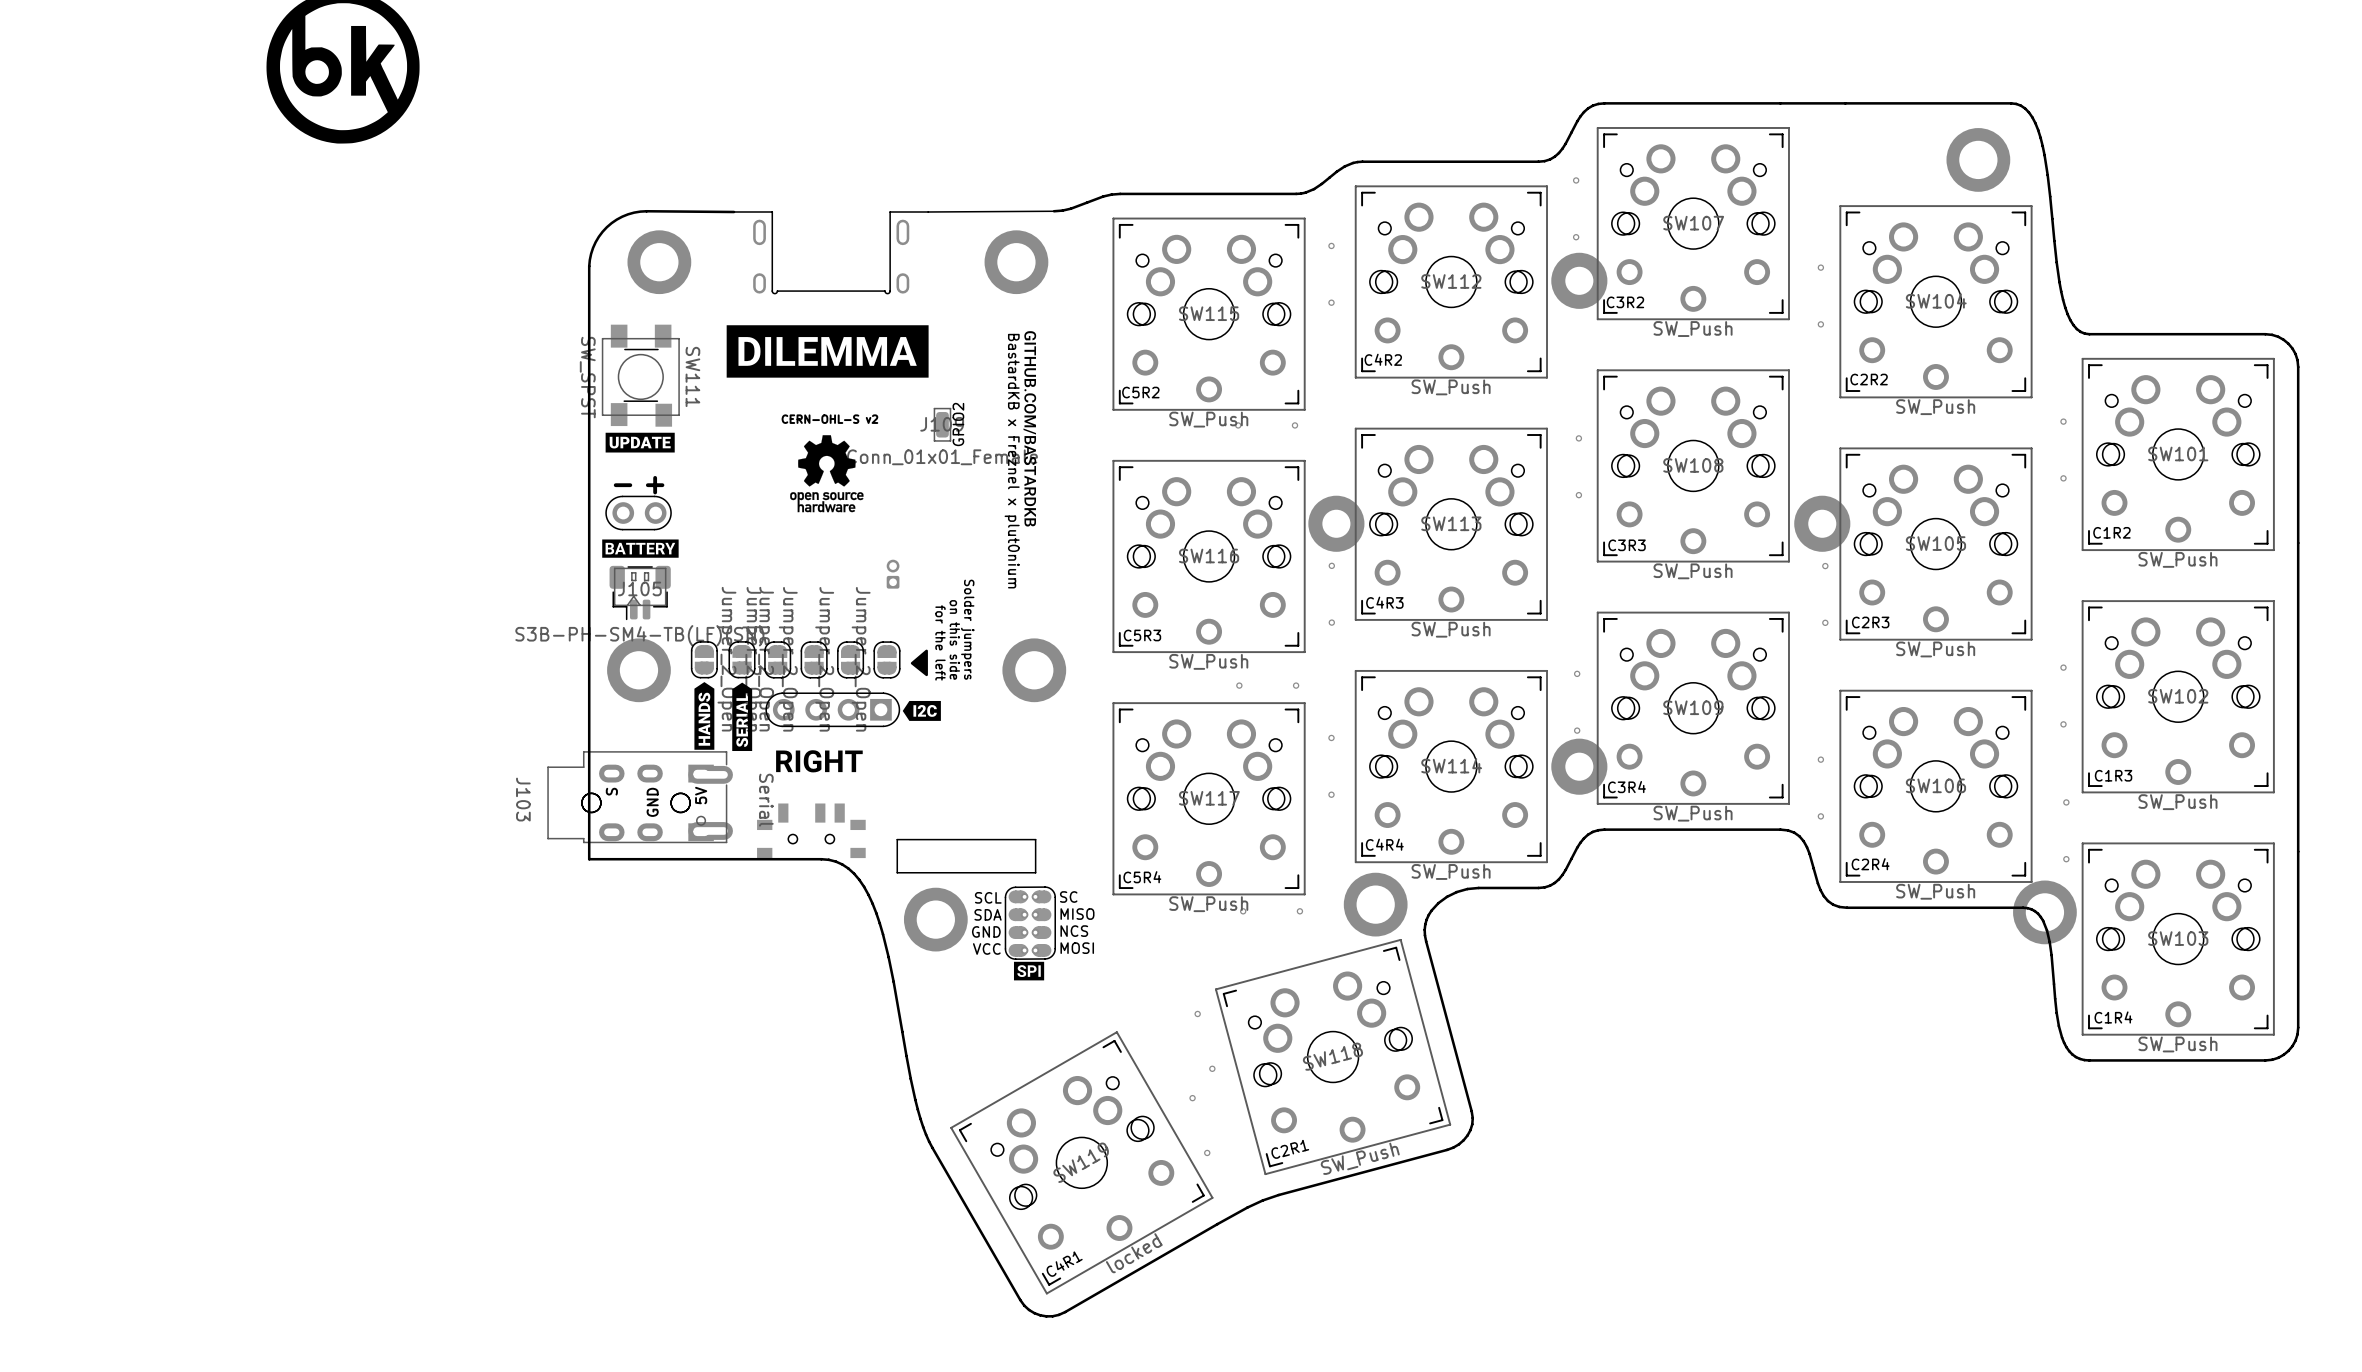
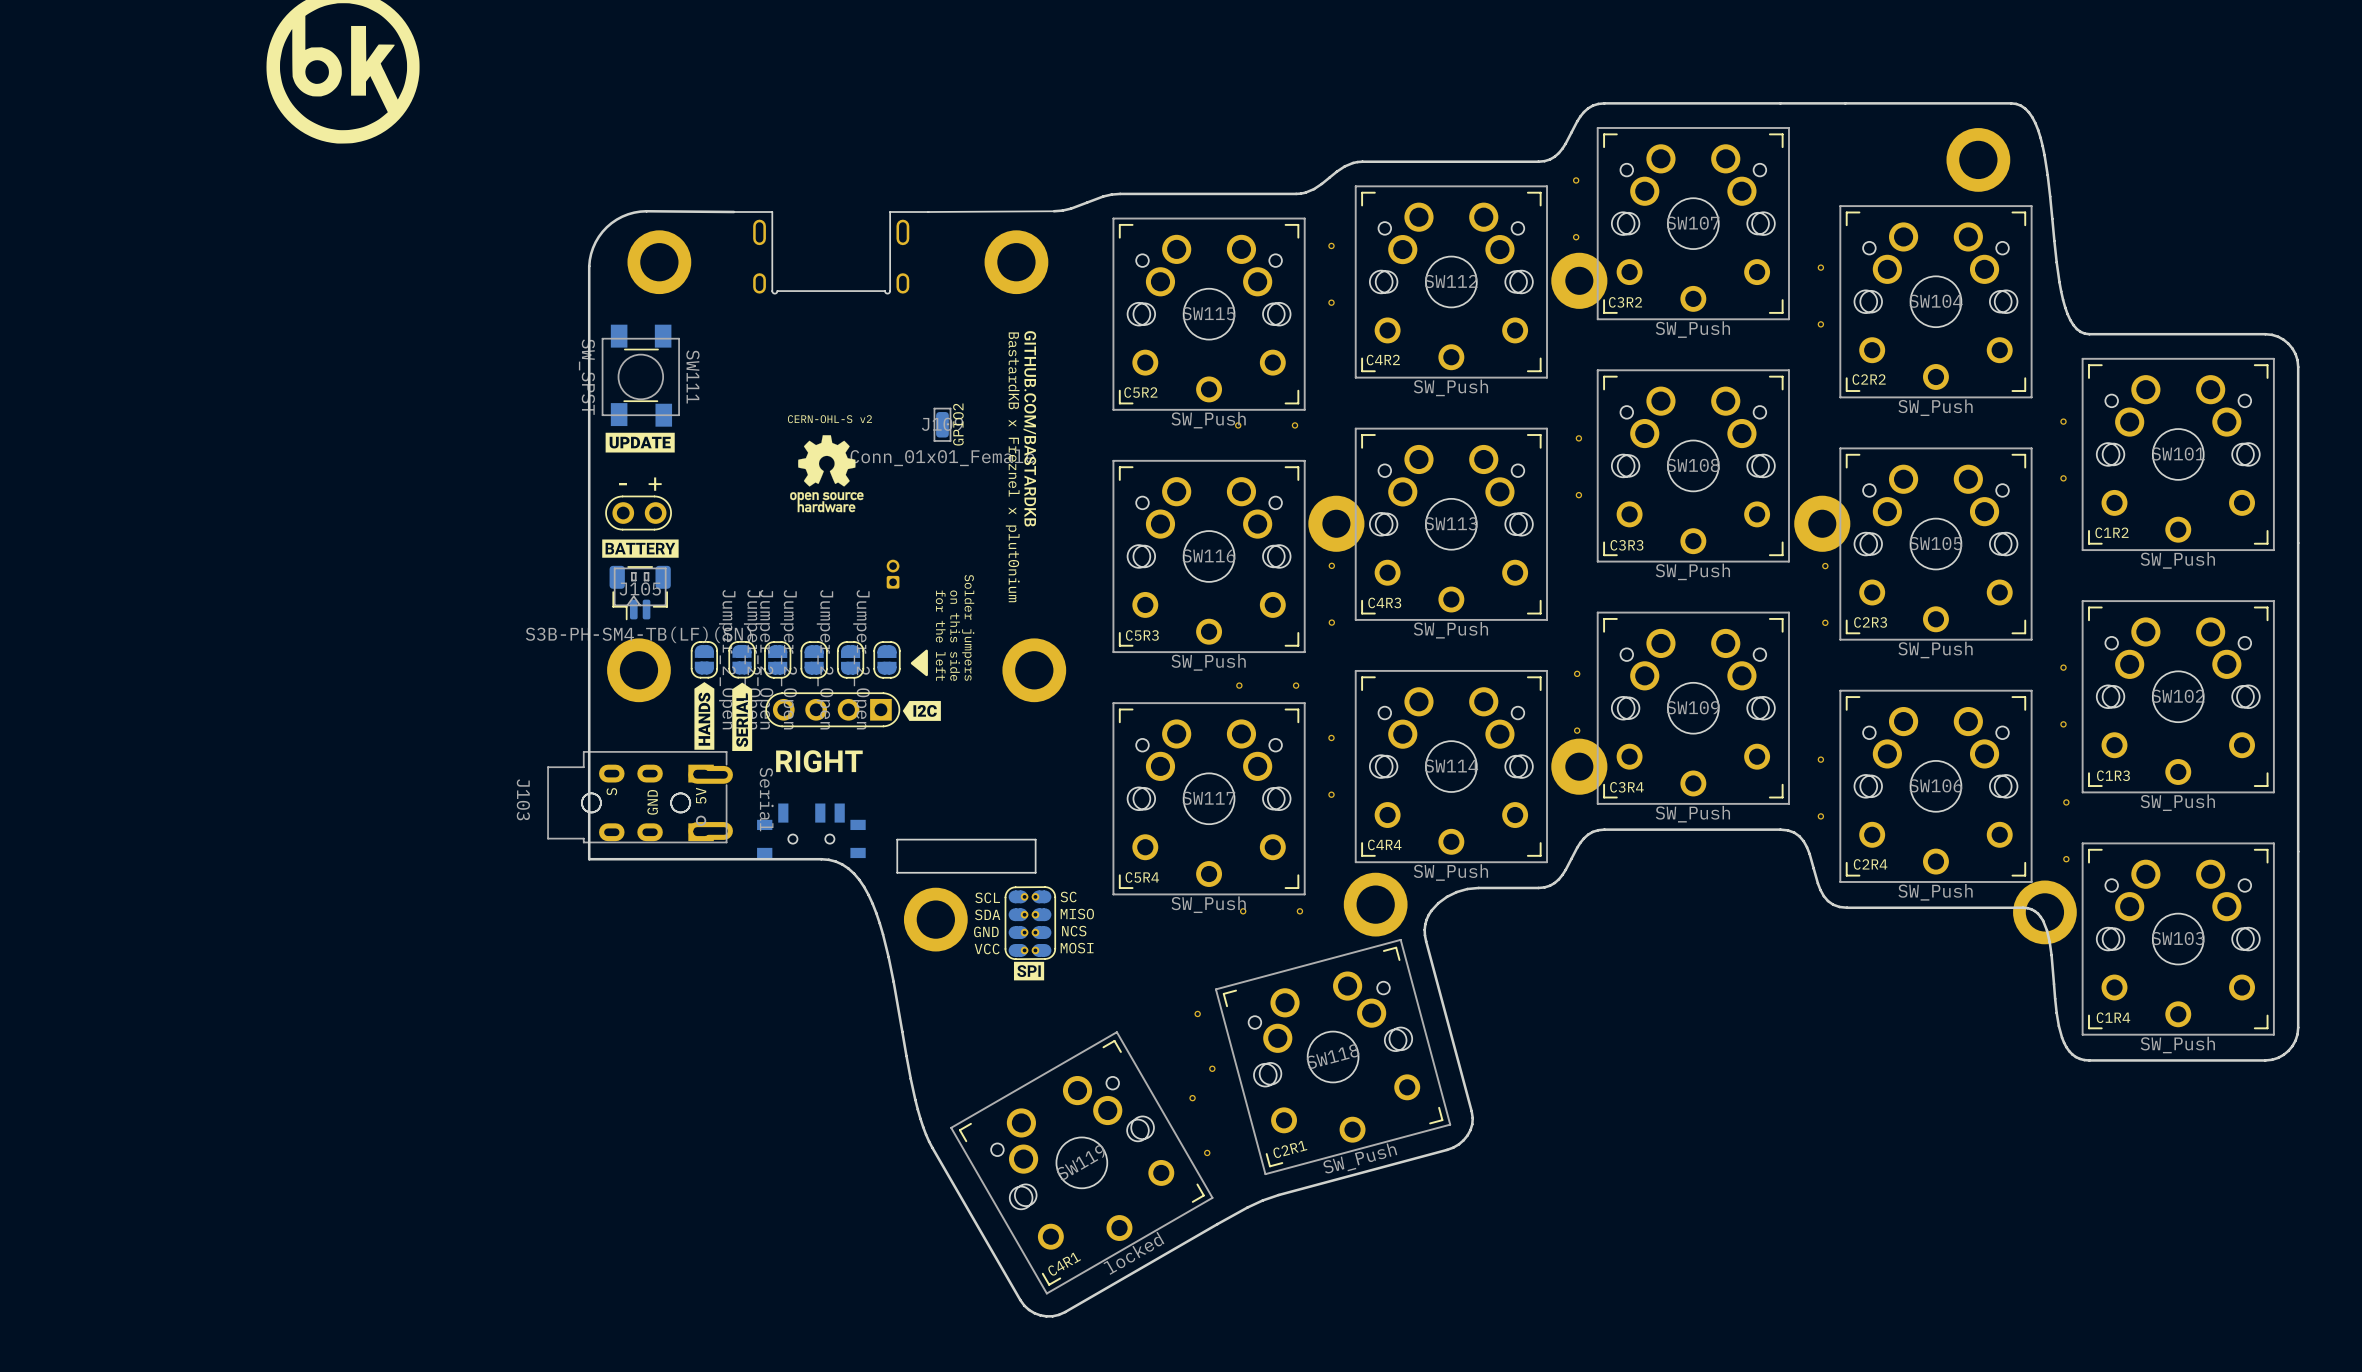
drawing: [726, 325, 929, 378] -> none

